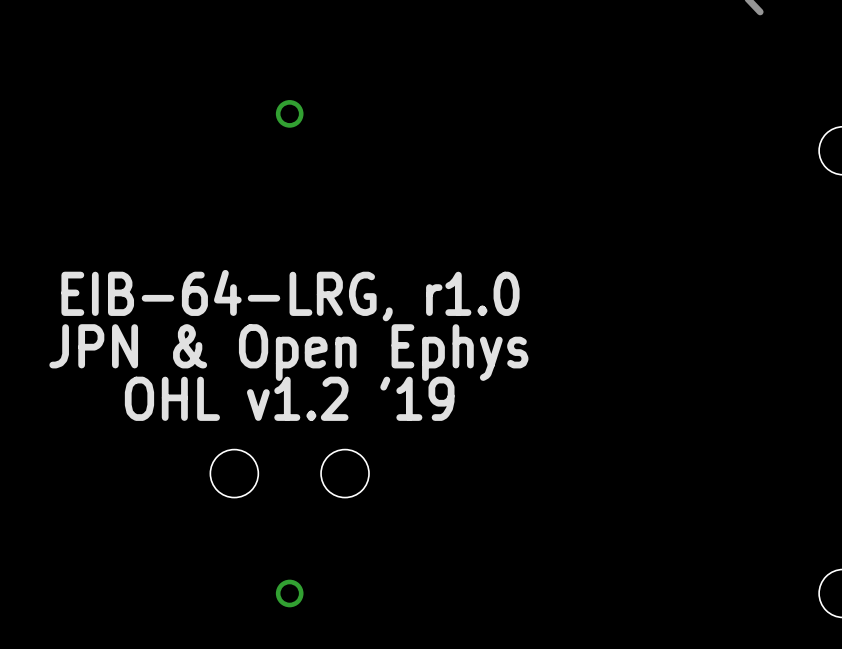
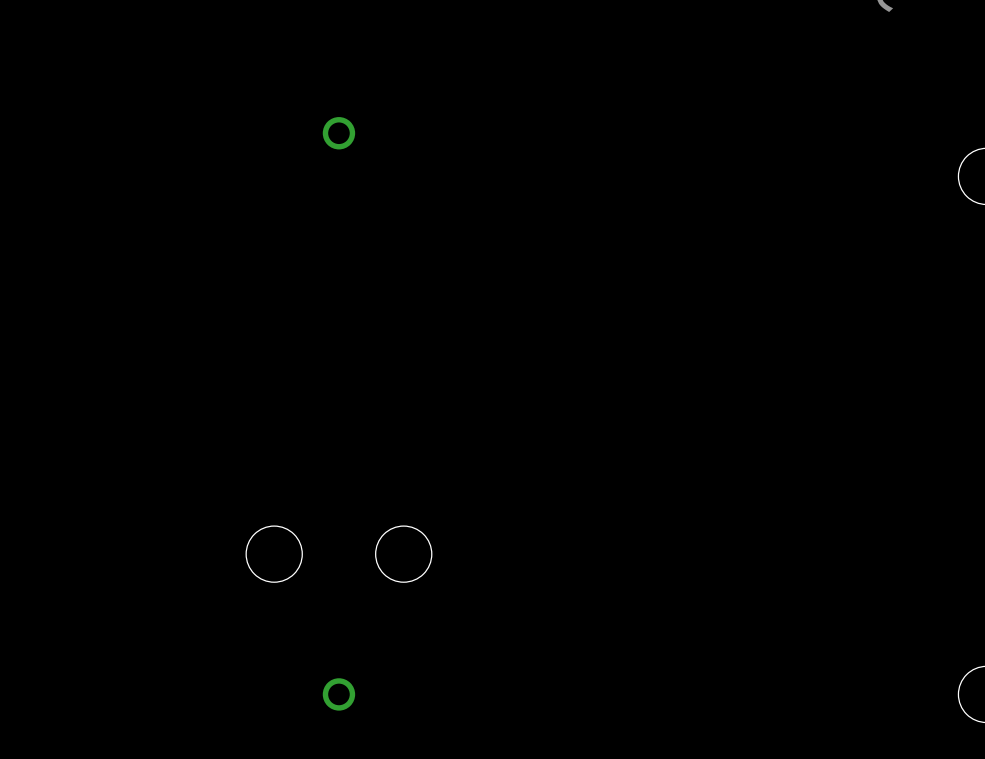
text: EIB-64-LRG, r1.0 (290, 295) -> none
text: JPN & Open Ephys (288, 352) -> none
text: OHL v1.2 '19 (289, 398) -> none

